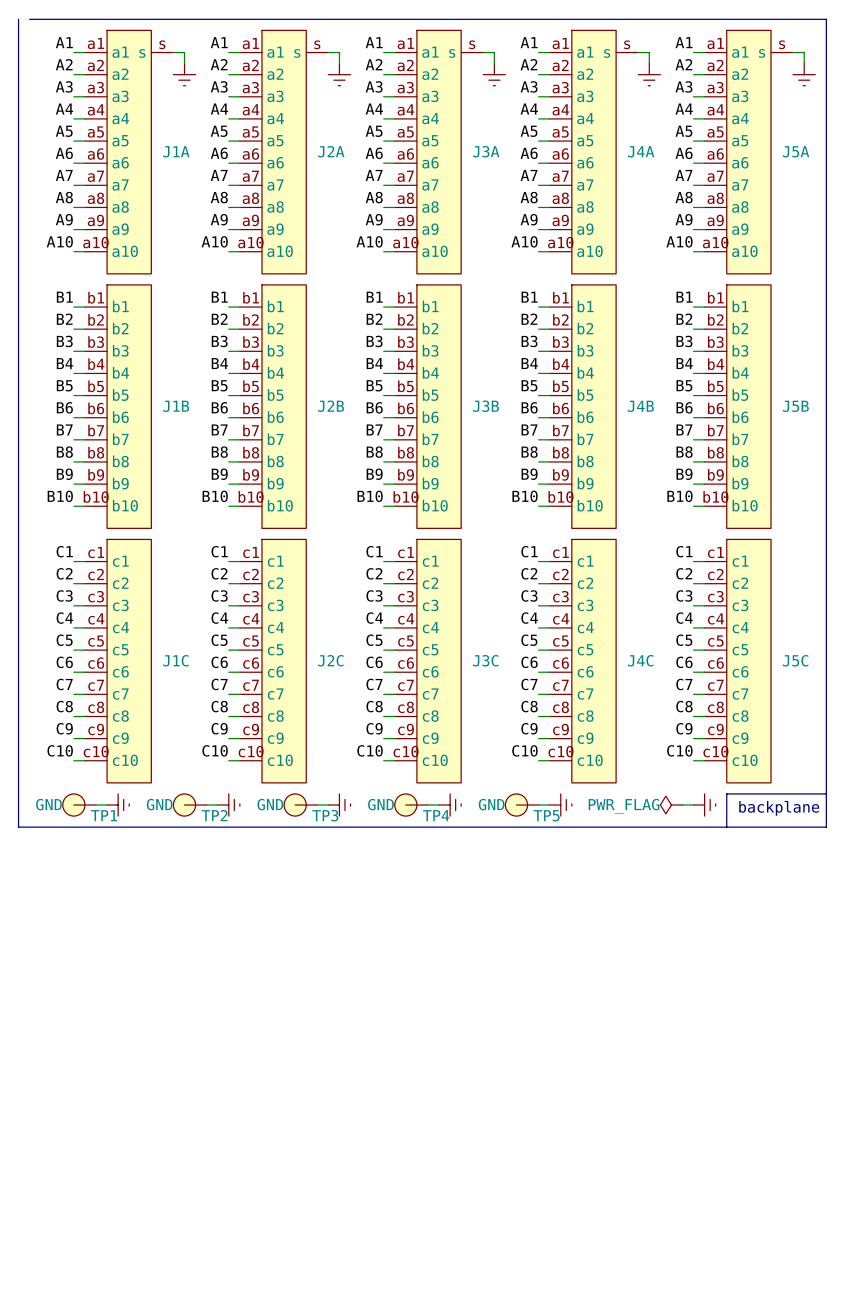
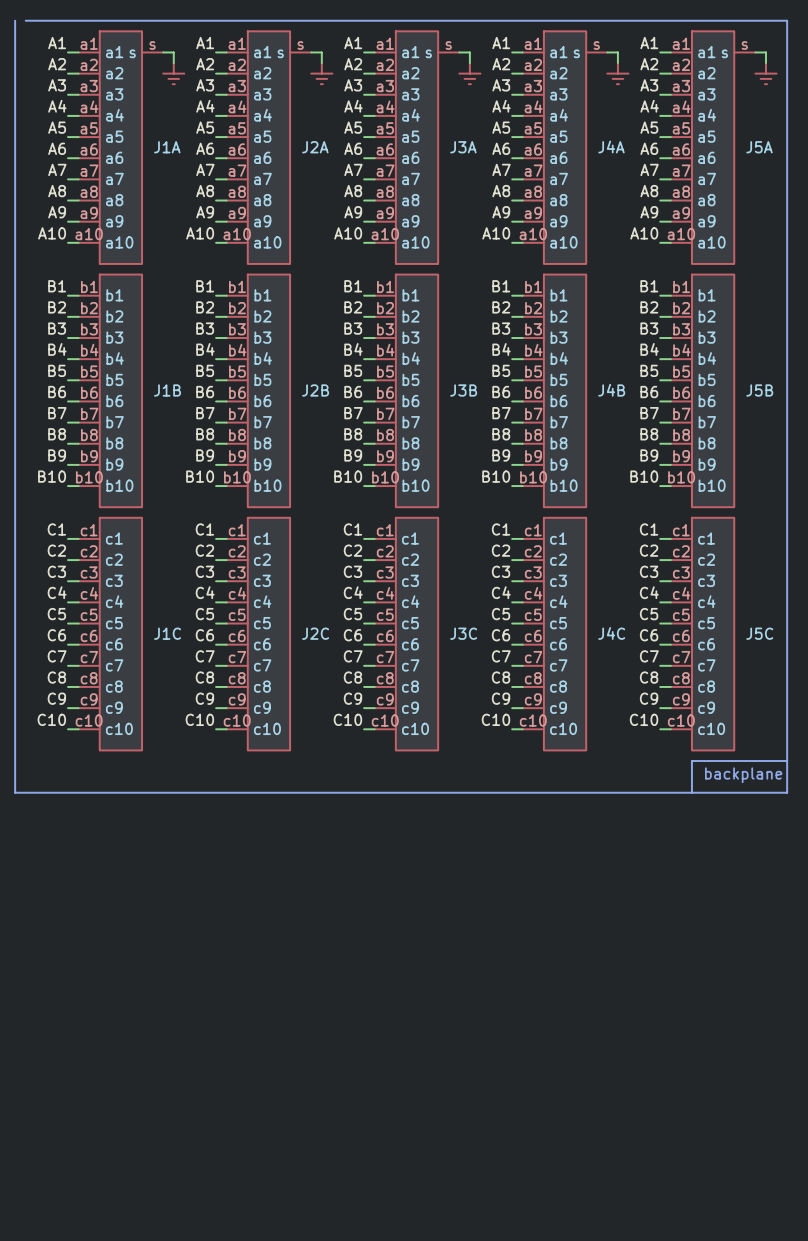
TP1: GND (79, 805) -> none
wire: (95, 805) (107, 805) -> none
power symbol: (118, 805) -> none
TP2: GND (190, 805) -> none
wire: (206, 805) (217, 805) -> none
power symbol: (228, 805) -> none
TP3: GND (300, 805) -> none
wire: (317, 805) (328, 805) -> none
power symbol: (339, 805) -> none
TP4: GND (411, 805) -> none
wire: (427, 805) (439, 805) -> none
power symbol: (450, 805) -> none
TP5: GND (522, 805) -> none
wire: (538, 805) (549, 805) -> none
power symbol: (560, 805) -> none
power symbol: PWR_FLAG (671, 805) -> none
wire: (682, 805) (693, 805) -> none
power symbol: (704, 805) -> none

